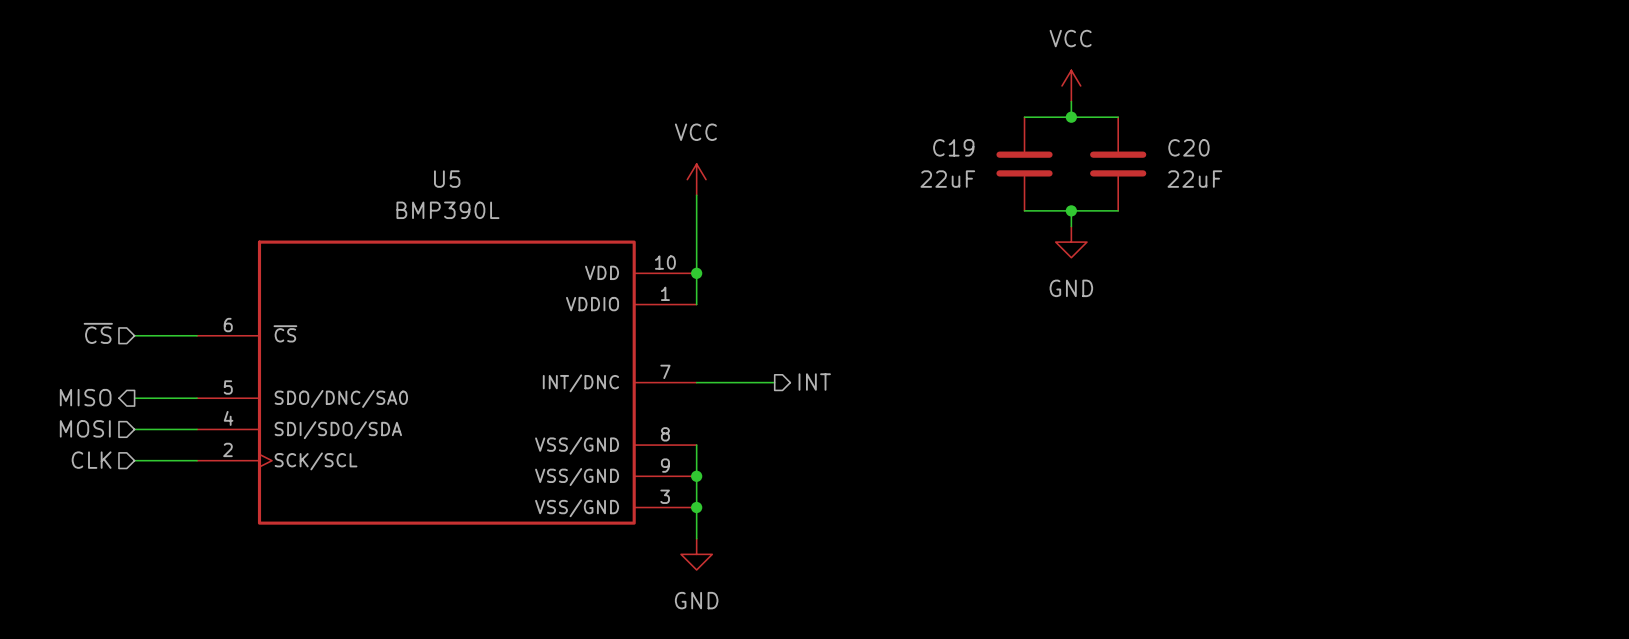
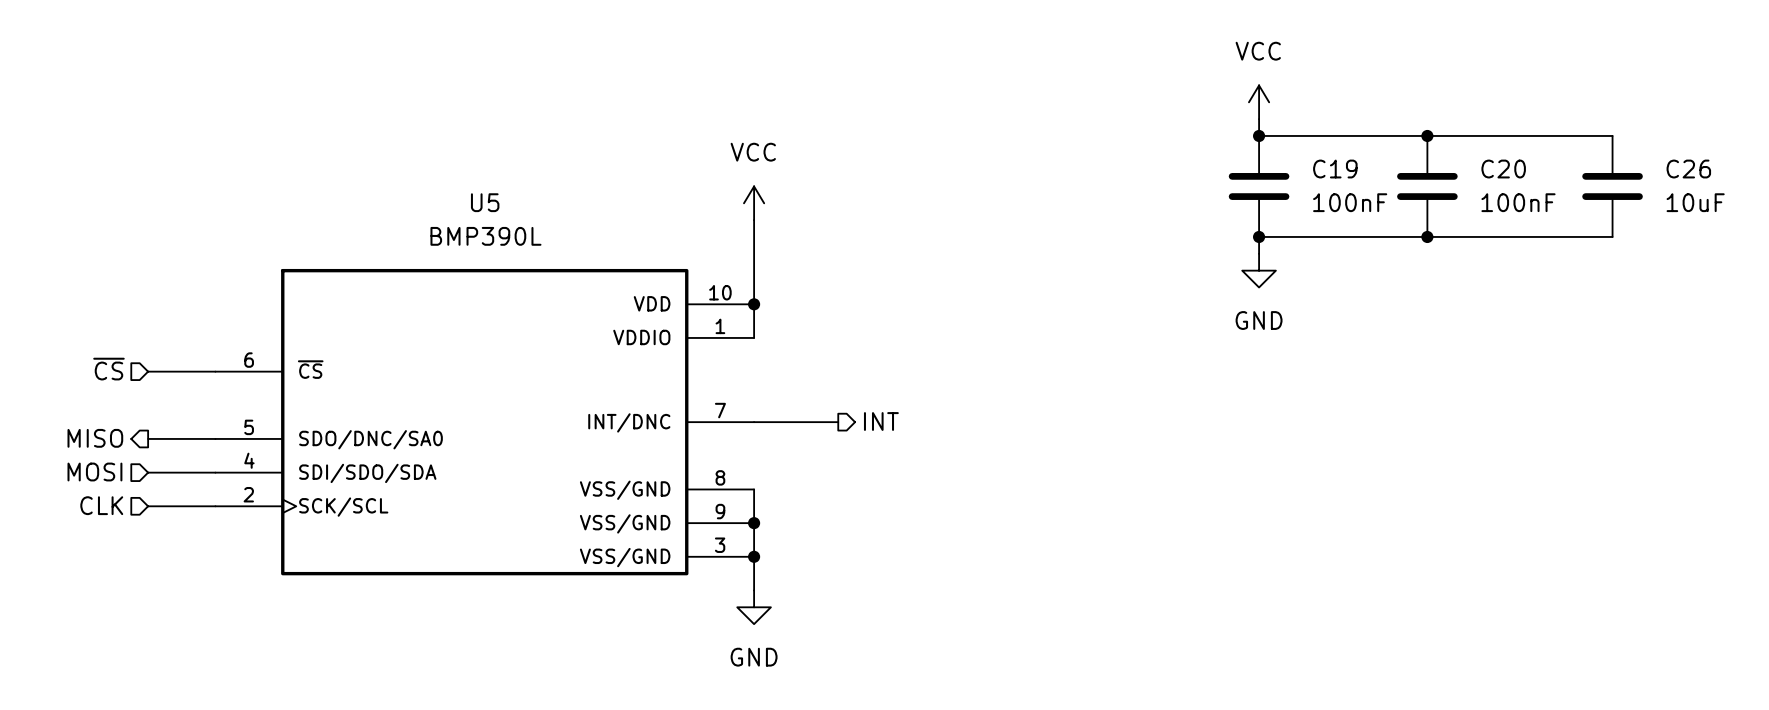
power symbol position: VCC (1071, 85) -> VCC (1259, 102)
wire: (1071, 101) (1071, 117) -> none
wire: none -> (1259, 119) (1259, 135) (1612, 135)
wire: (1024, 117) (1118, 117) -> none
junction: (1071, 117) -> none
junction: none -> (1259, 135)
junction: none -> (1427, 135)
C19 name position: C19 (953, 147) -> C19 (1335, 169)
C19 position: (1024, 164) -> (1259, 186)
C20 position: (1118, 164) -> (1427, 186)
C26: none -> 10uF (1612, 186)
C19 value: 22uF (947, 179) -> 100nF (1350, 202)
C20 value: 22uF (1194, 179) -> 100nF (1518, 202)
wire: (1024, 210) (1118, 210) -> none
wire: (1071, 210) (1071, 226) -> none
junction: (1071, 210) -> none
junction: none -> (1259, 236)
junction: none -> (1427, 236)
wire: none -> (1612, 236) (1259, 236) (1259, 253)
power symbol position: GND (1071, 242) -> GND (1259, 270)

